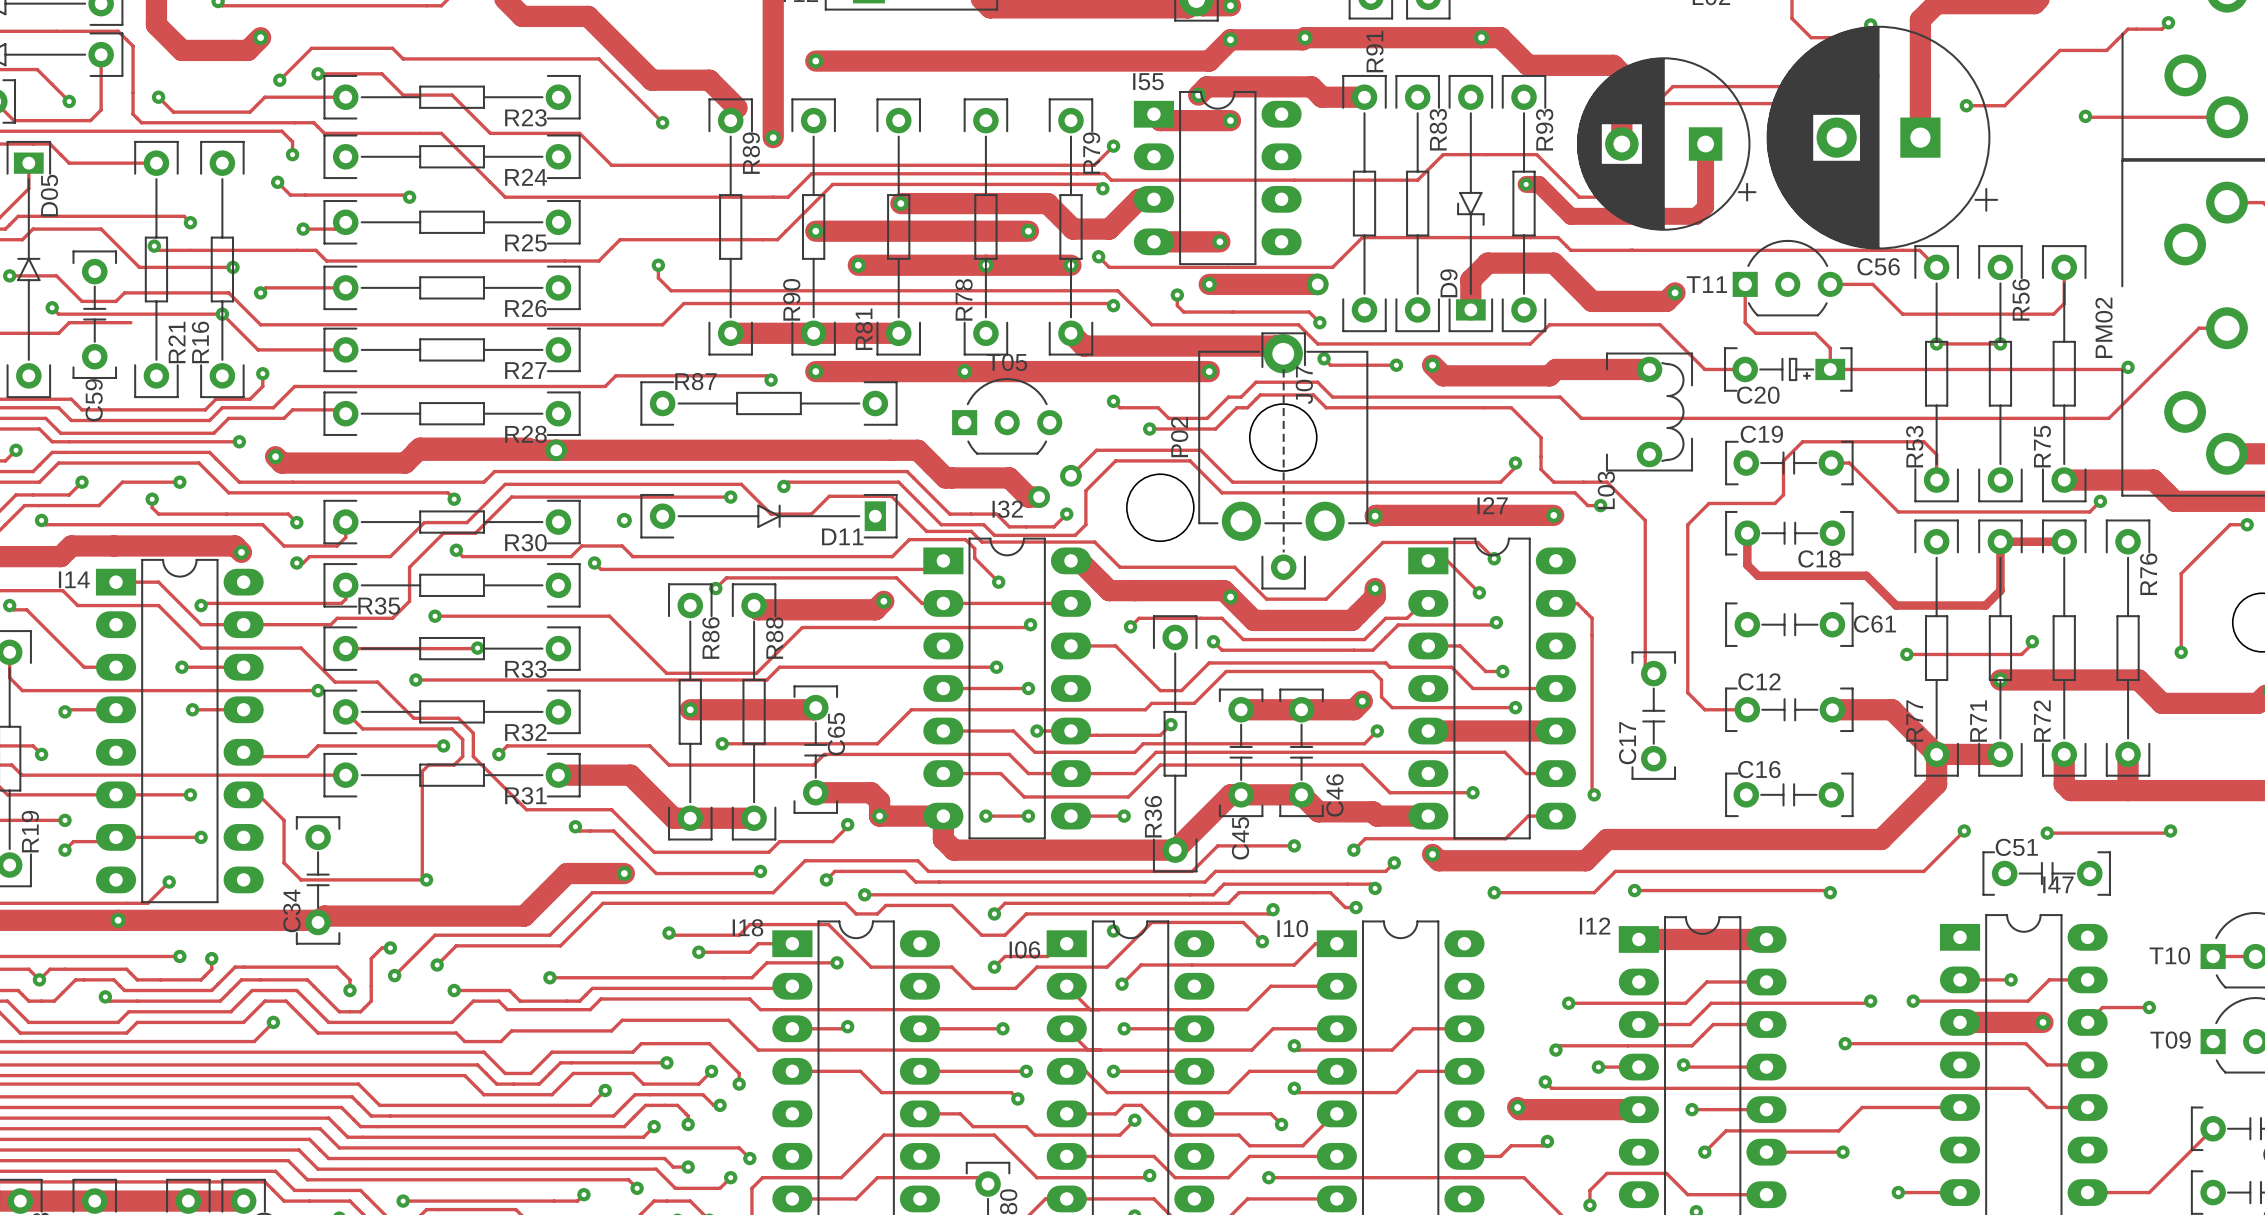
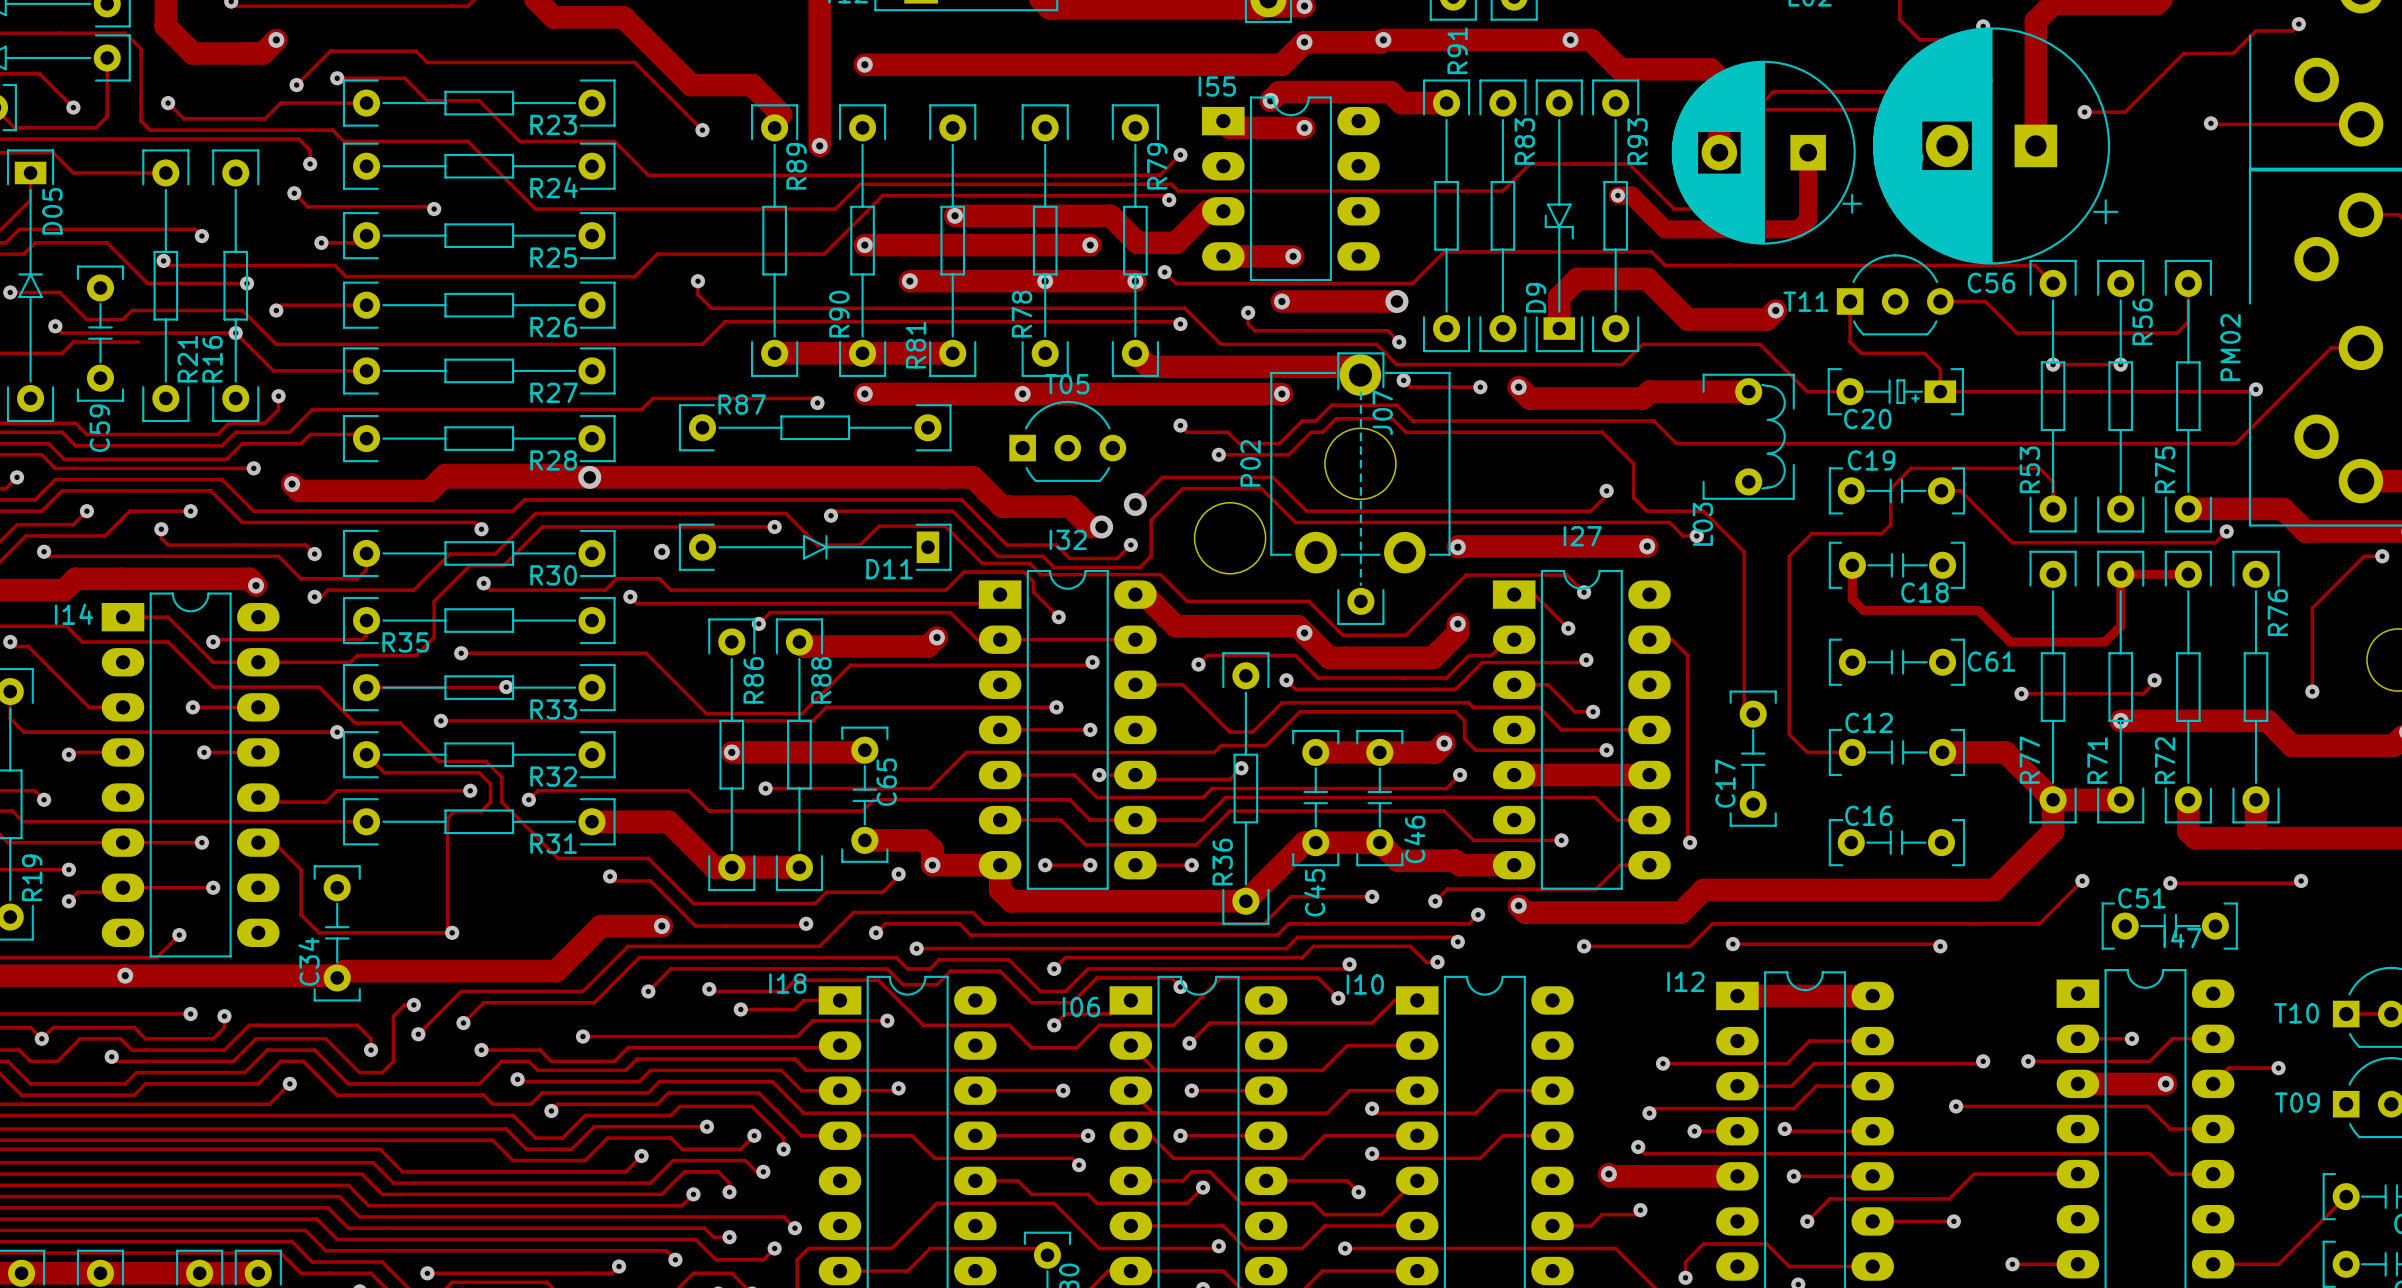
track: none -> (1180, 986) (1171, 977) (1097, 977) (1072, 1002) (1031, 1002) (1000, 971) (950, 971) (936, 984) (903, 984) (887, 968) (670, 968) (648, 991)
via: none -> (648, 991)
track: none -> (517, 1079) (519, 1081) (639, 1081) (650, 1070) (781, 1070) (801, 1090) (840, 1090)
via: none -> (517, 1079)
track: none -> (551, 1110) (558, 1104) (657, 1104) (668, 1092) (758, 1092) (801, 1135) (840, 1135)
via: none -> (551, 1110)

